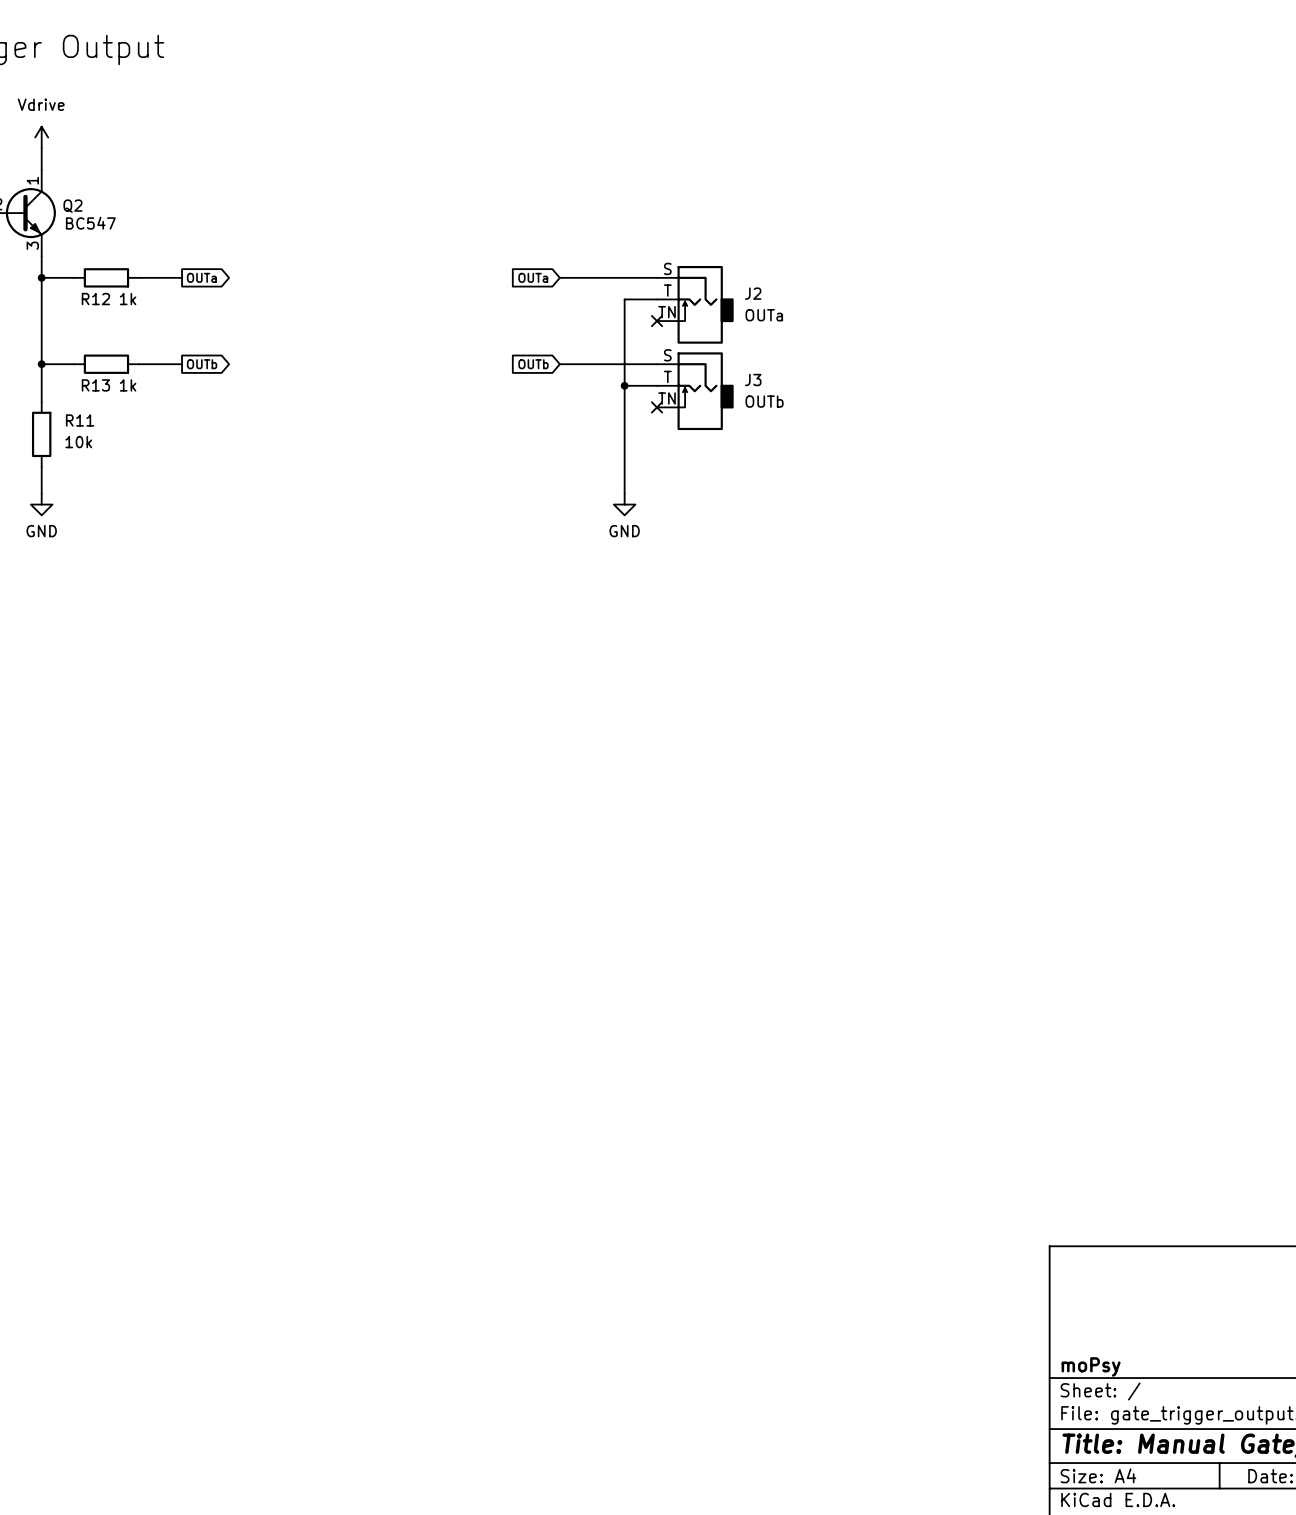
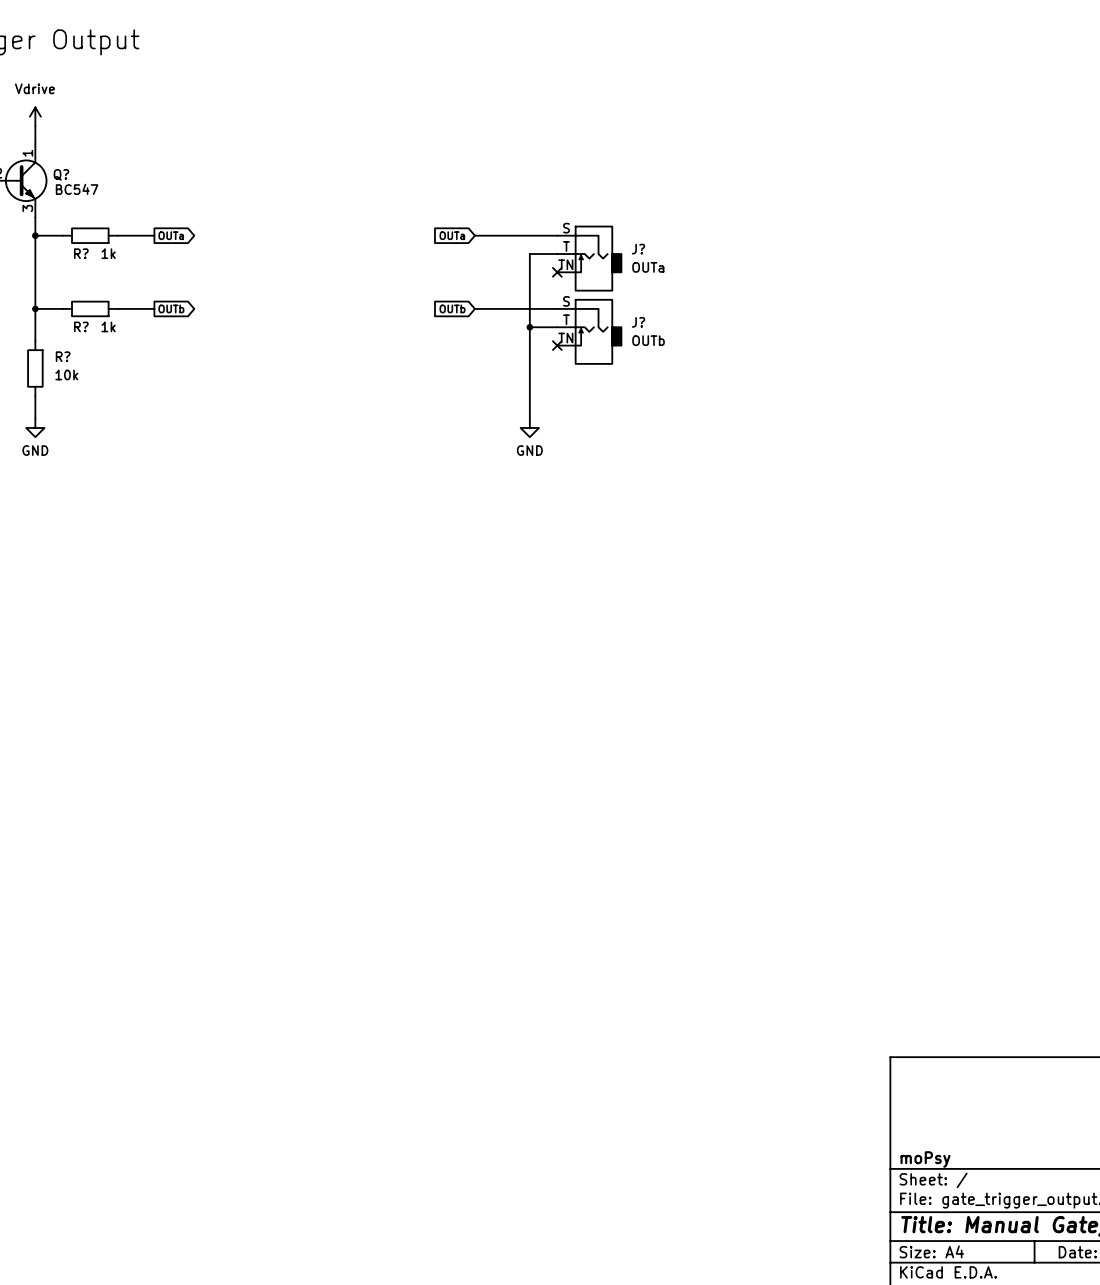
Q2 name: Q2 (72, 206) -> Q? (61, 174)
J2 name: J2 (753, 293) -> J? (638, 249)
R12 name: R12 (95, 299) -> R? (81, 253)
J3 name: J3 (753, 380) -> J? (638, 322)
R13 name: R13 (95, 385) -> R? (81, 326)
R11 name: R11 (80, 420) -> R? (63, 356)

